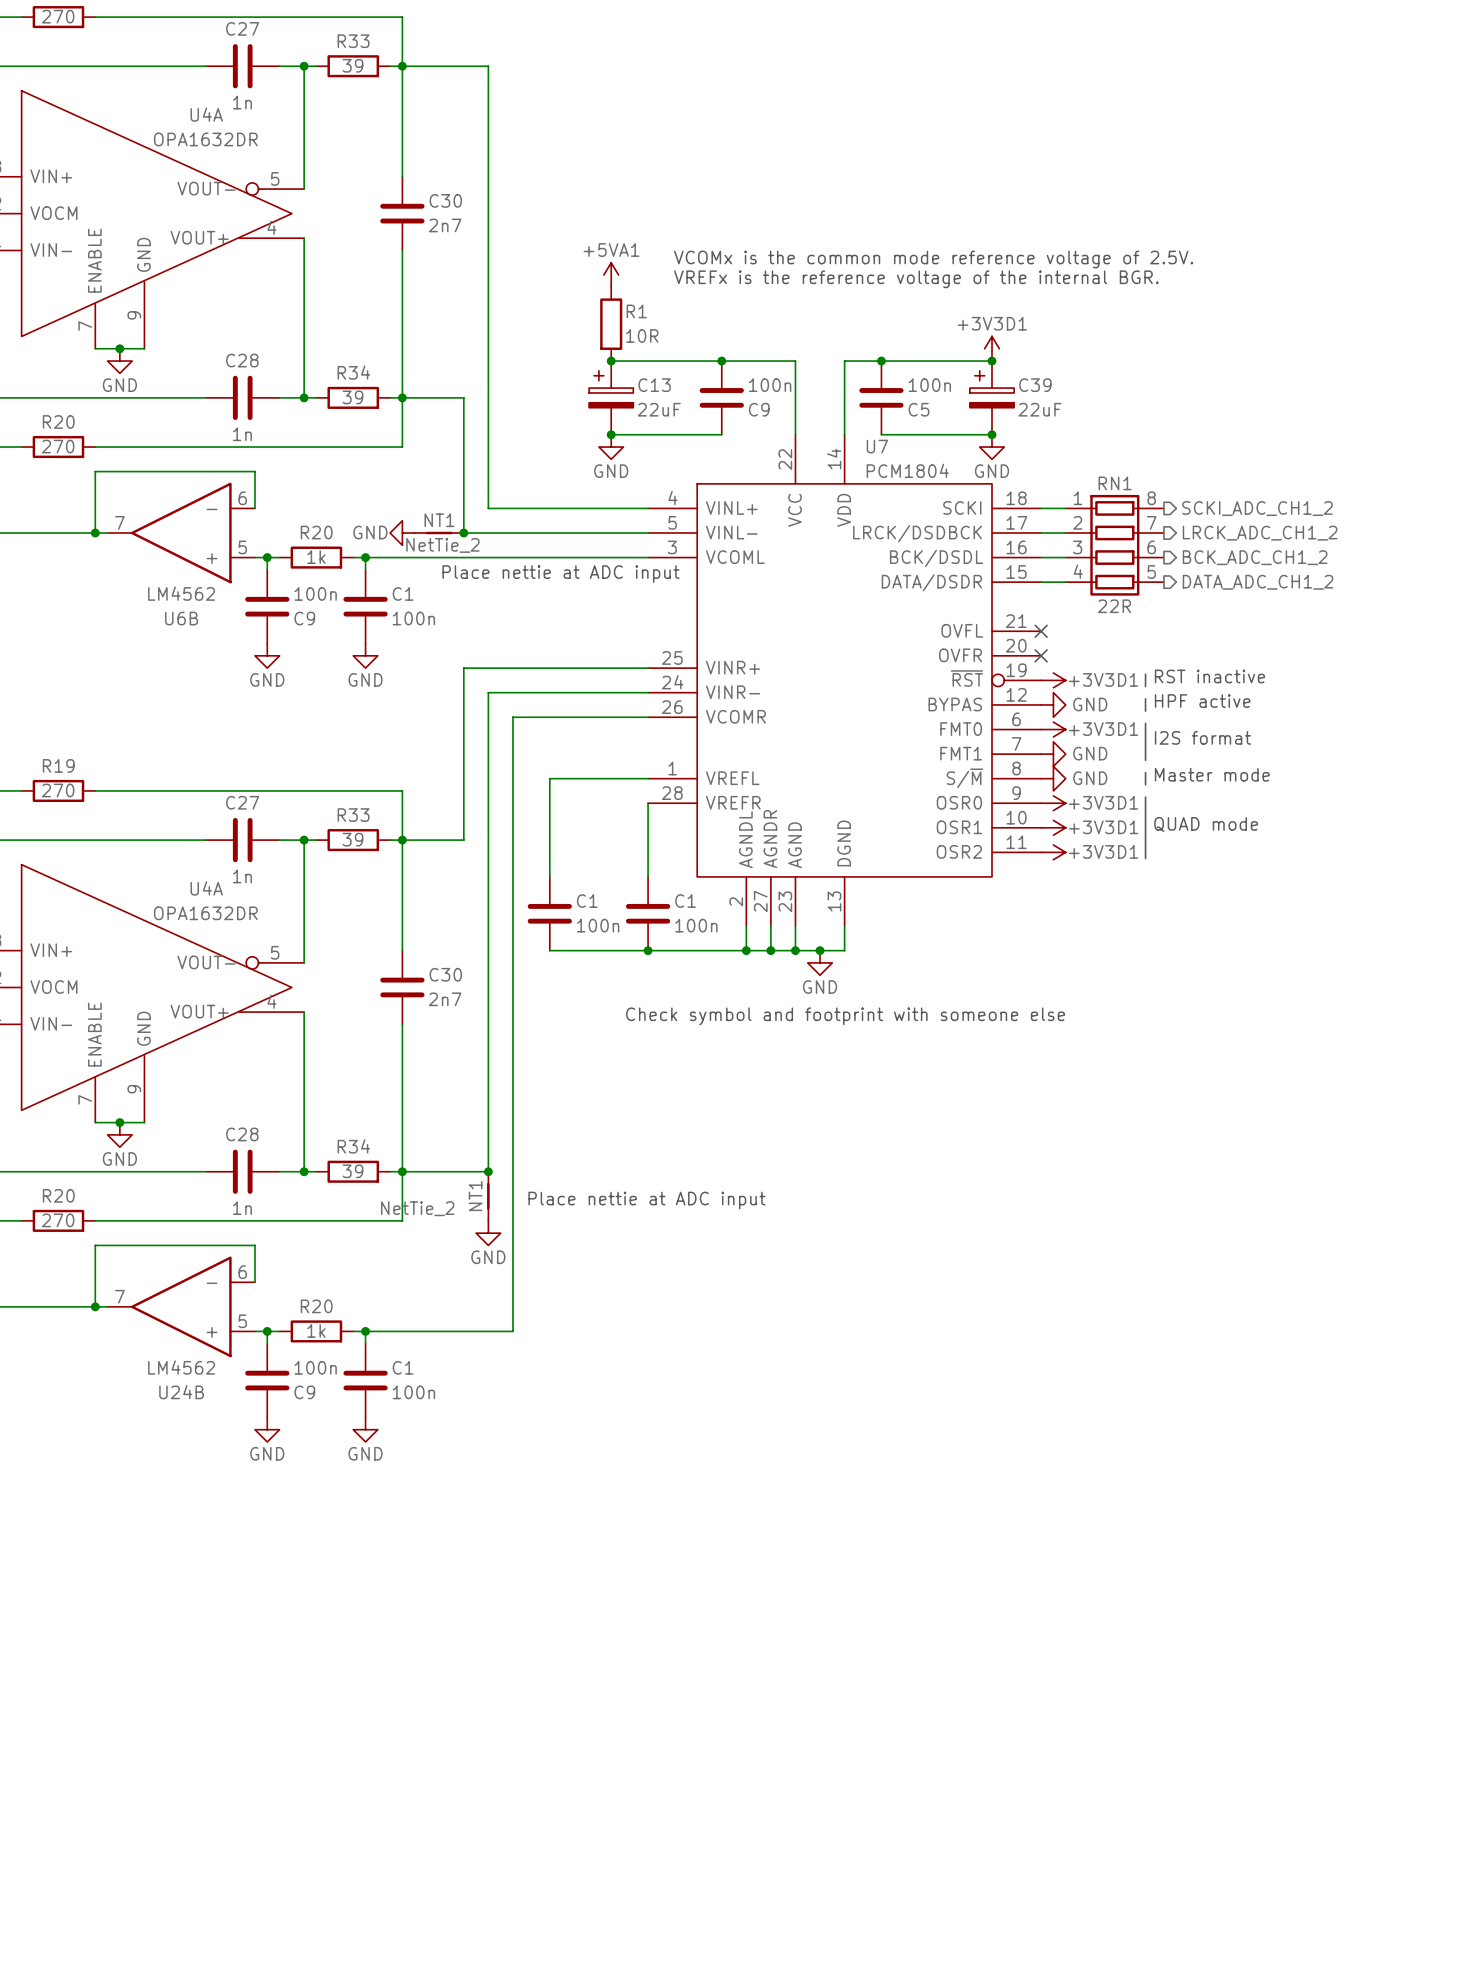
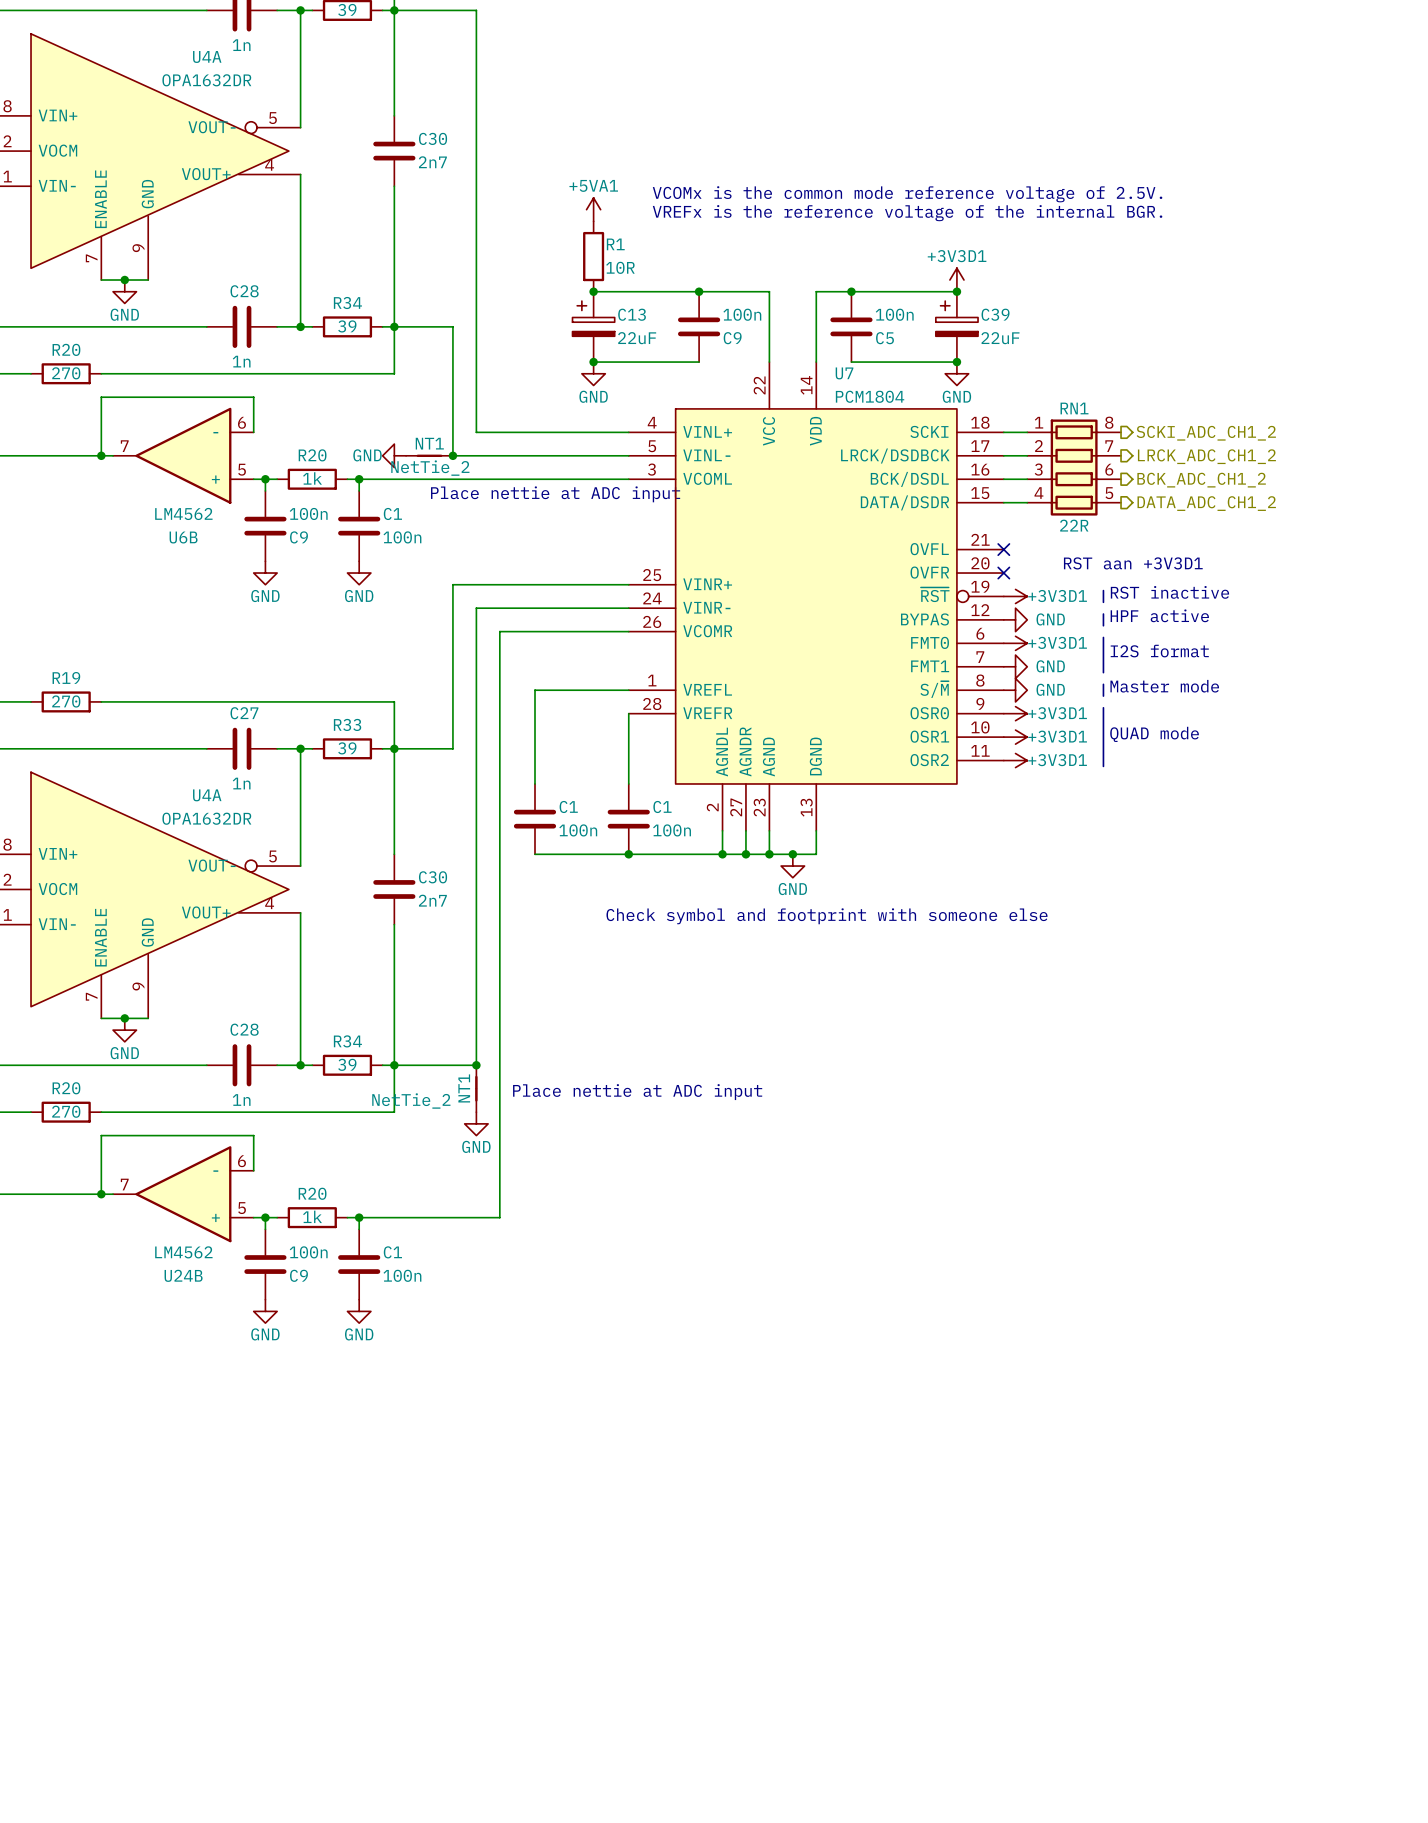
text: none -> RST aan +3V3D1 (1133, 563)

